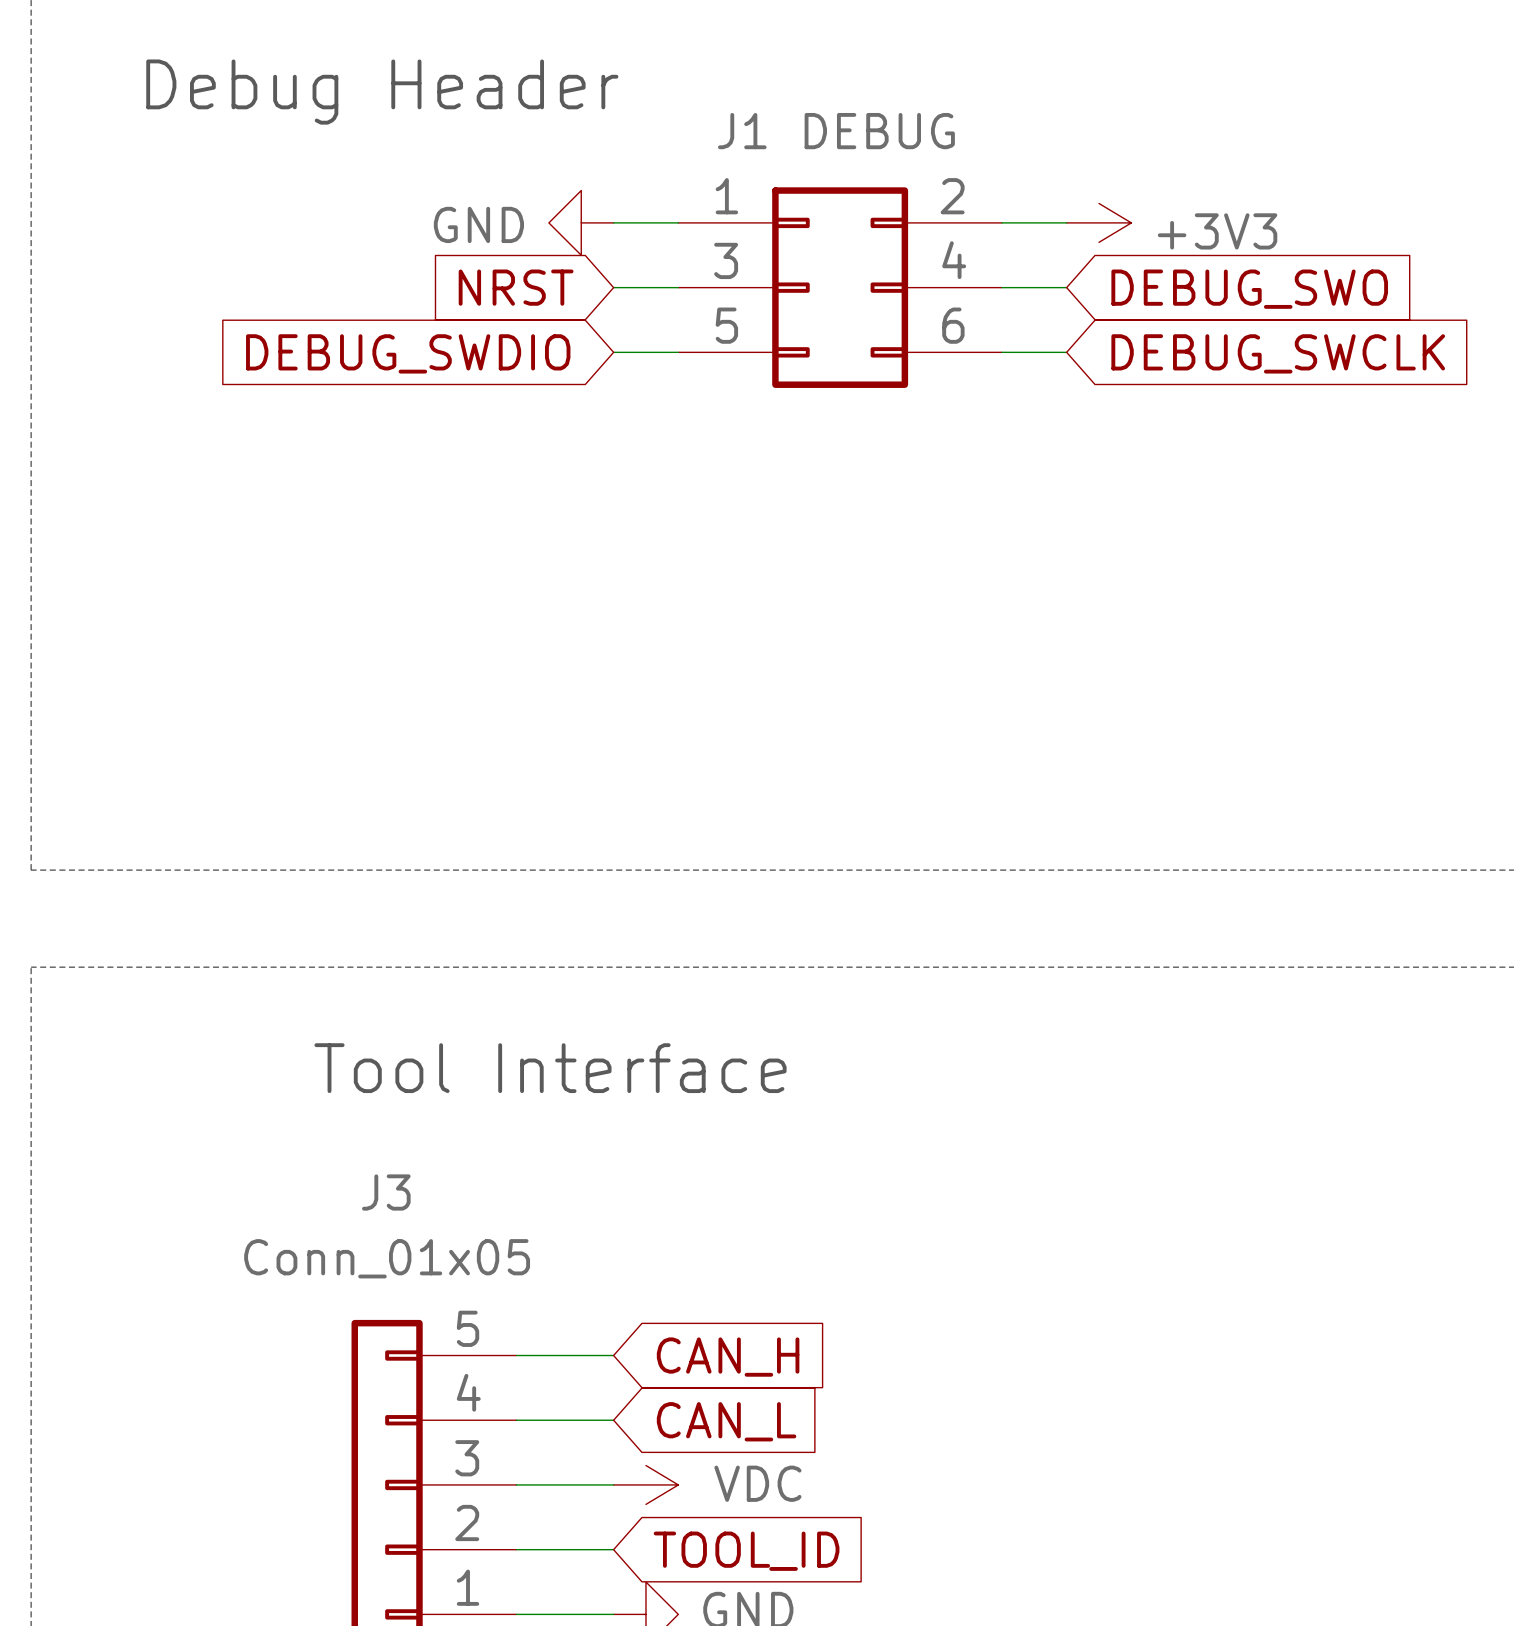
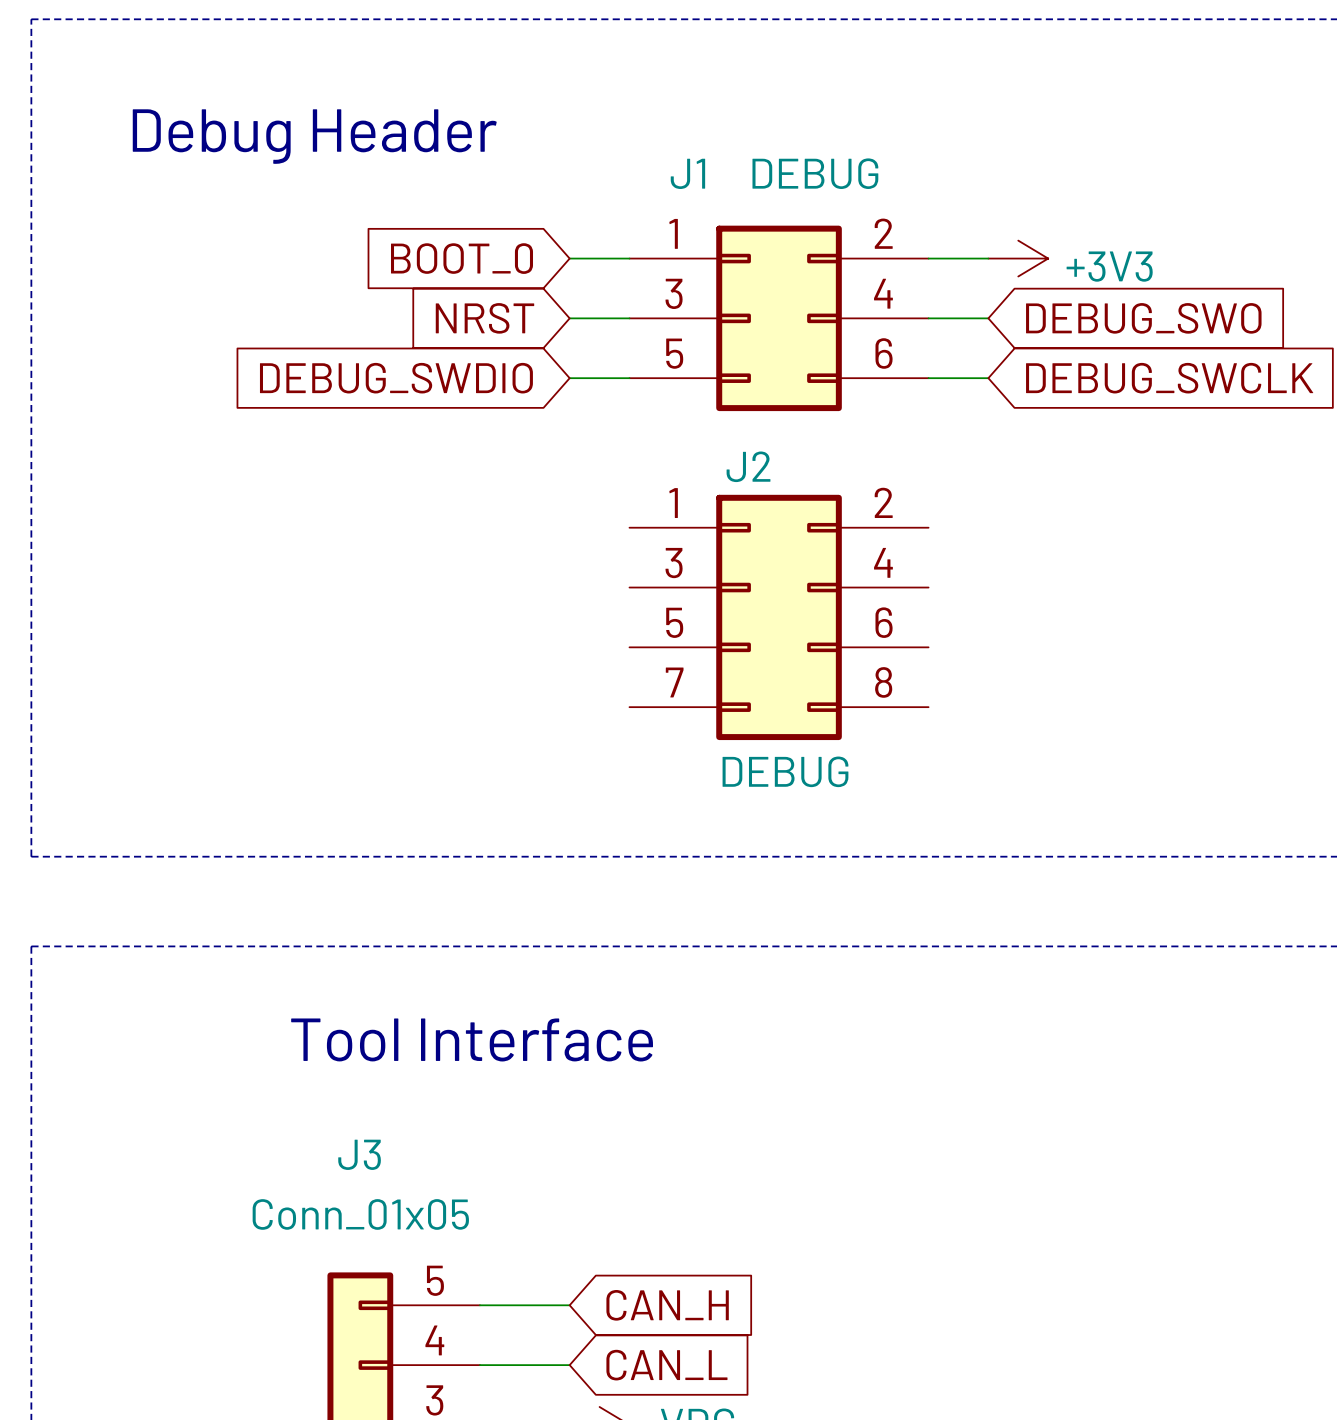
power symbol: GND (581, 222) -> none
global label: none -> BOOT_0 (462, 258)
J2: none -> DEBUG (779, 617)

